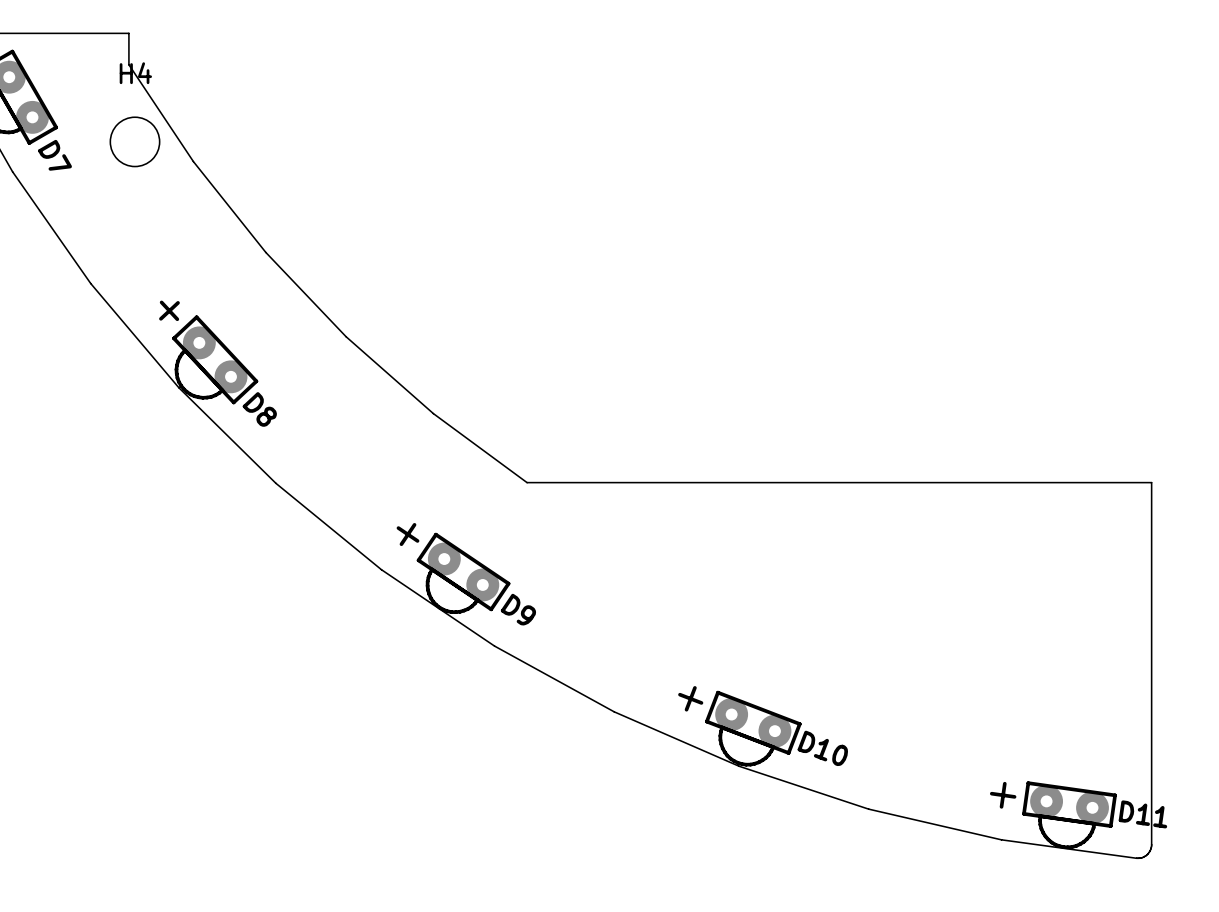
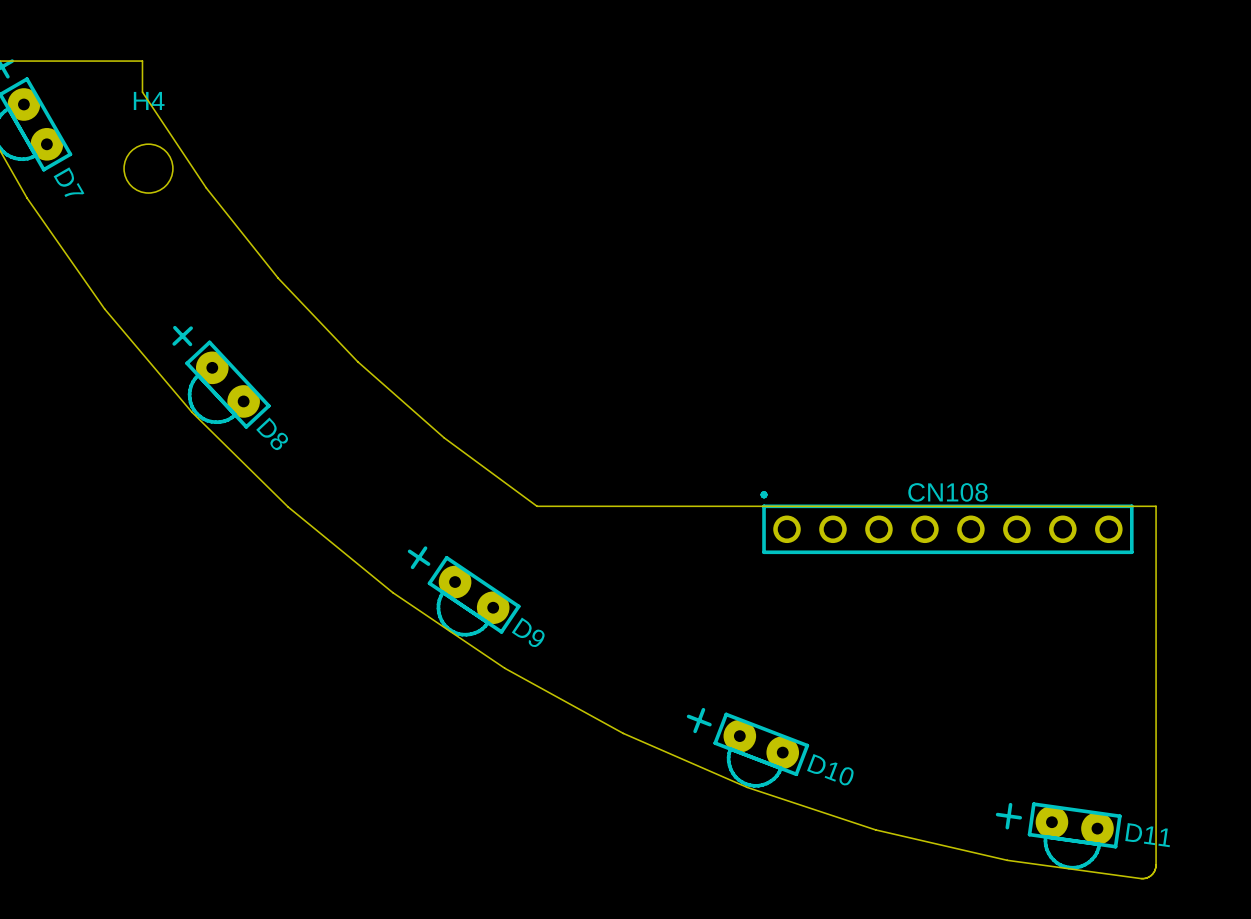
CN108: none -> (947, 522)

